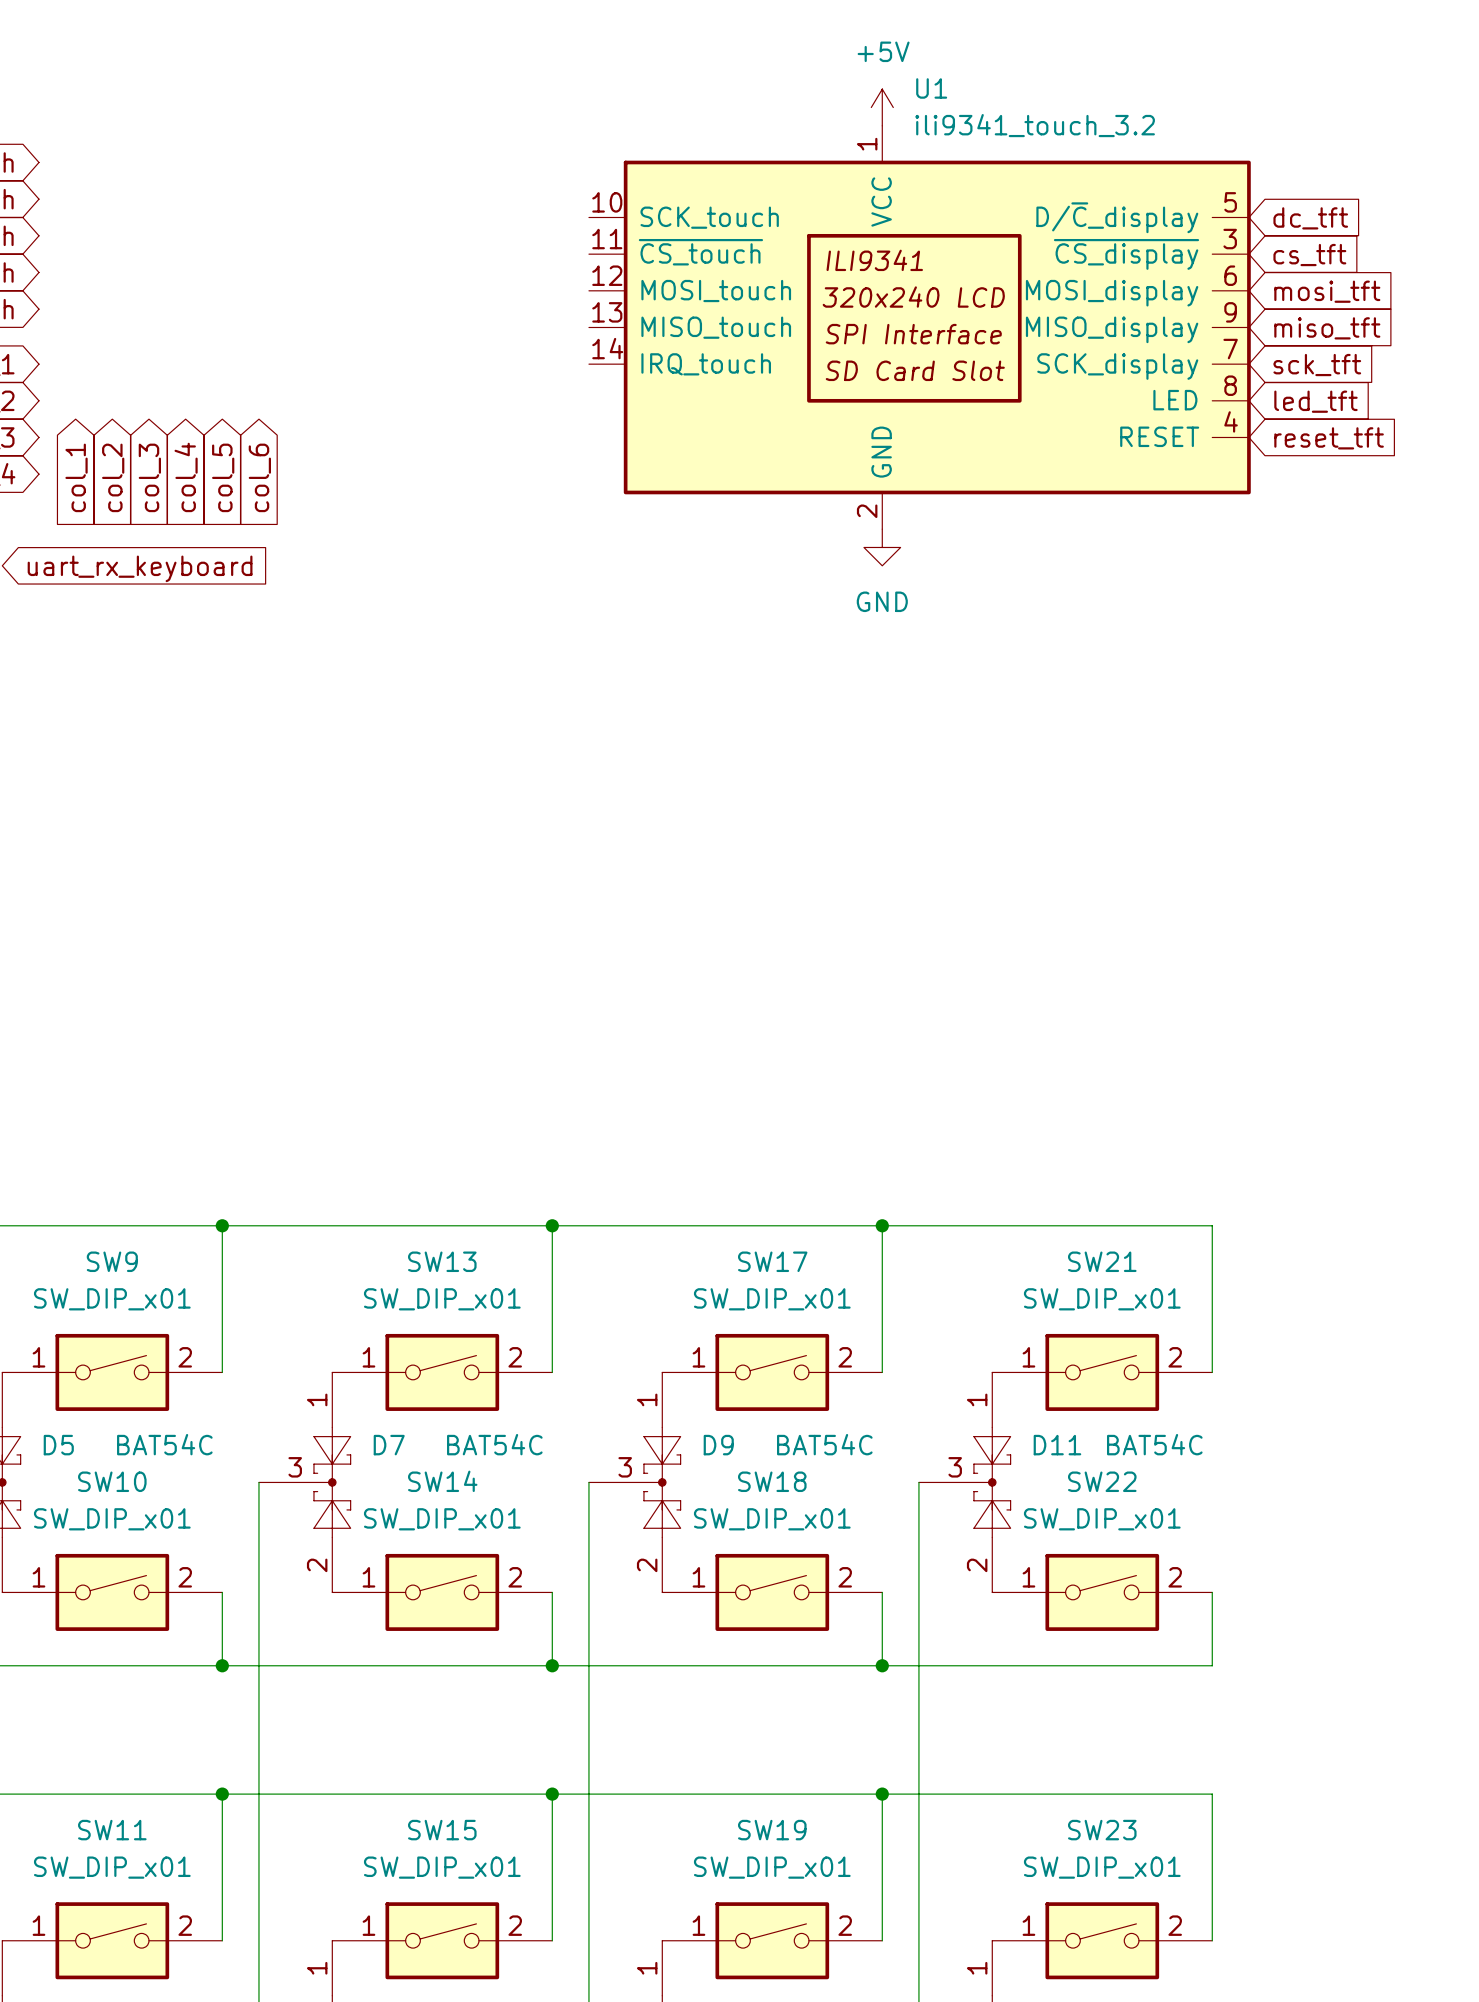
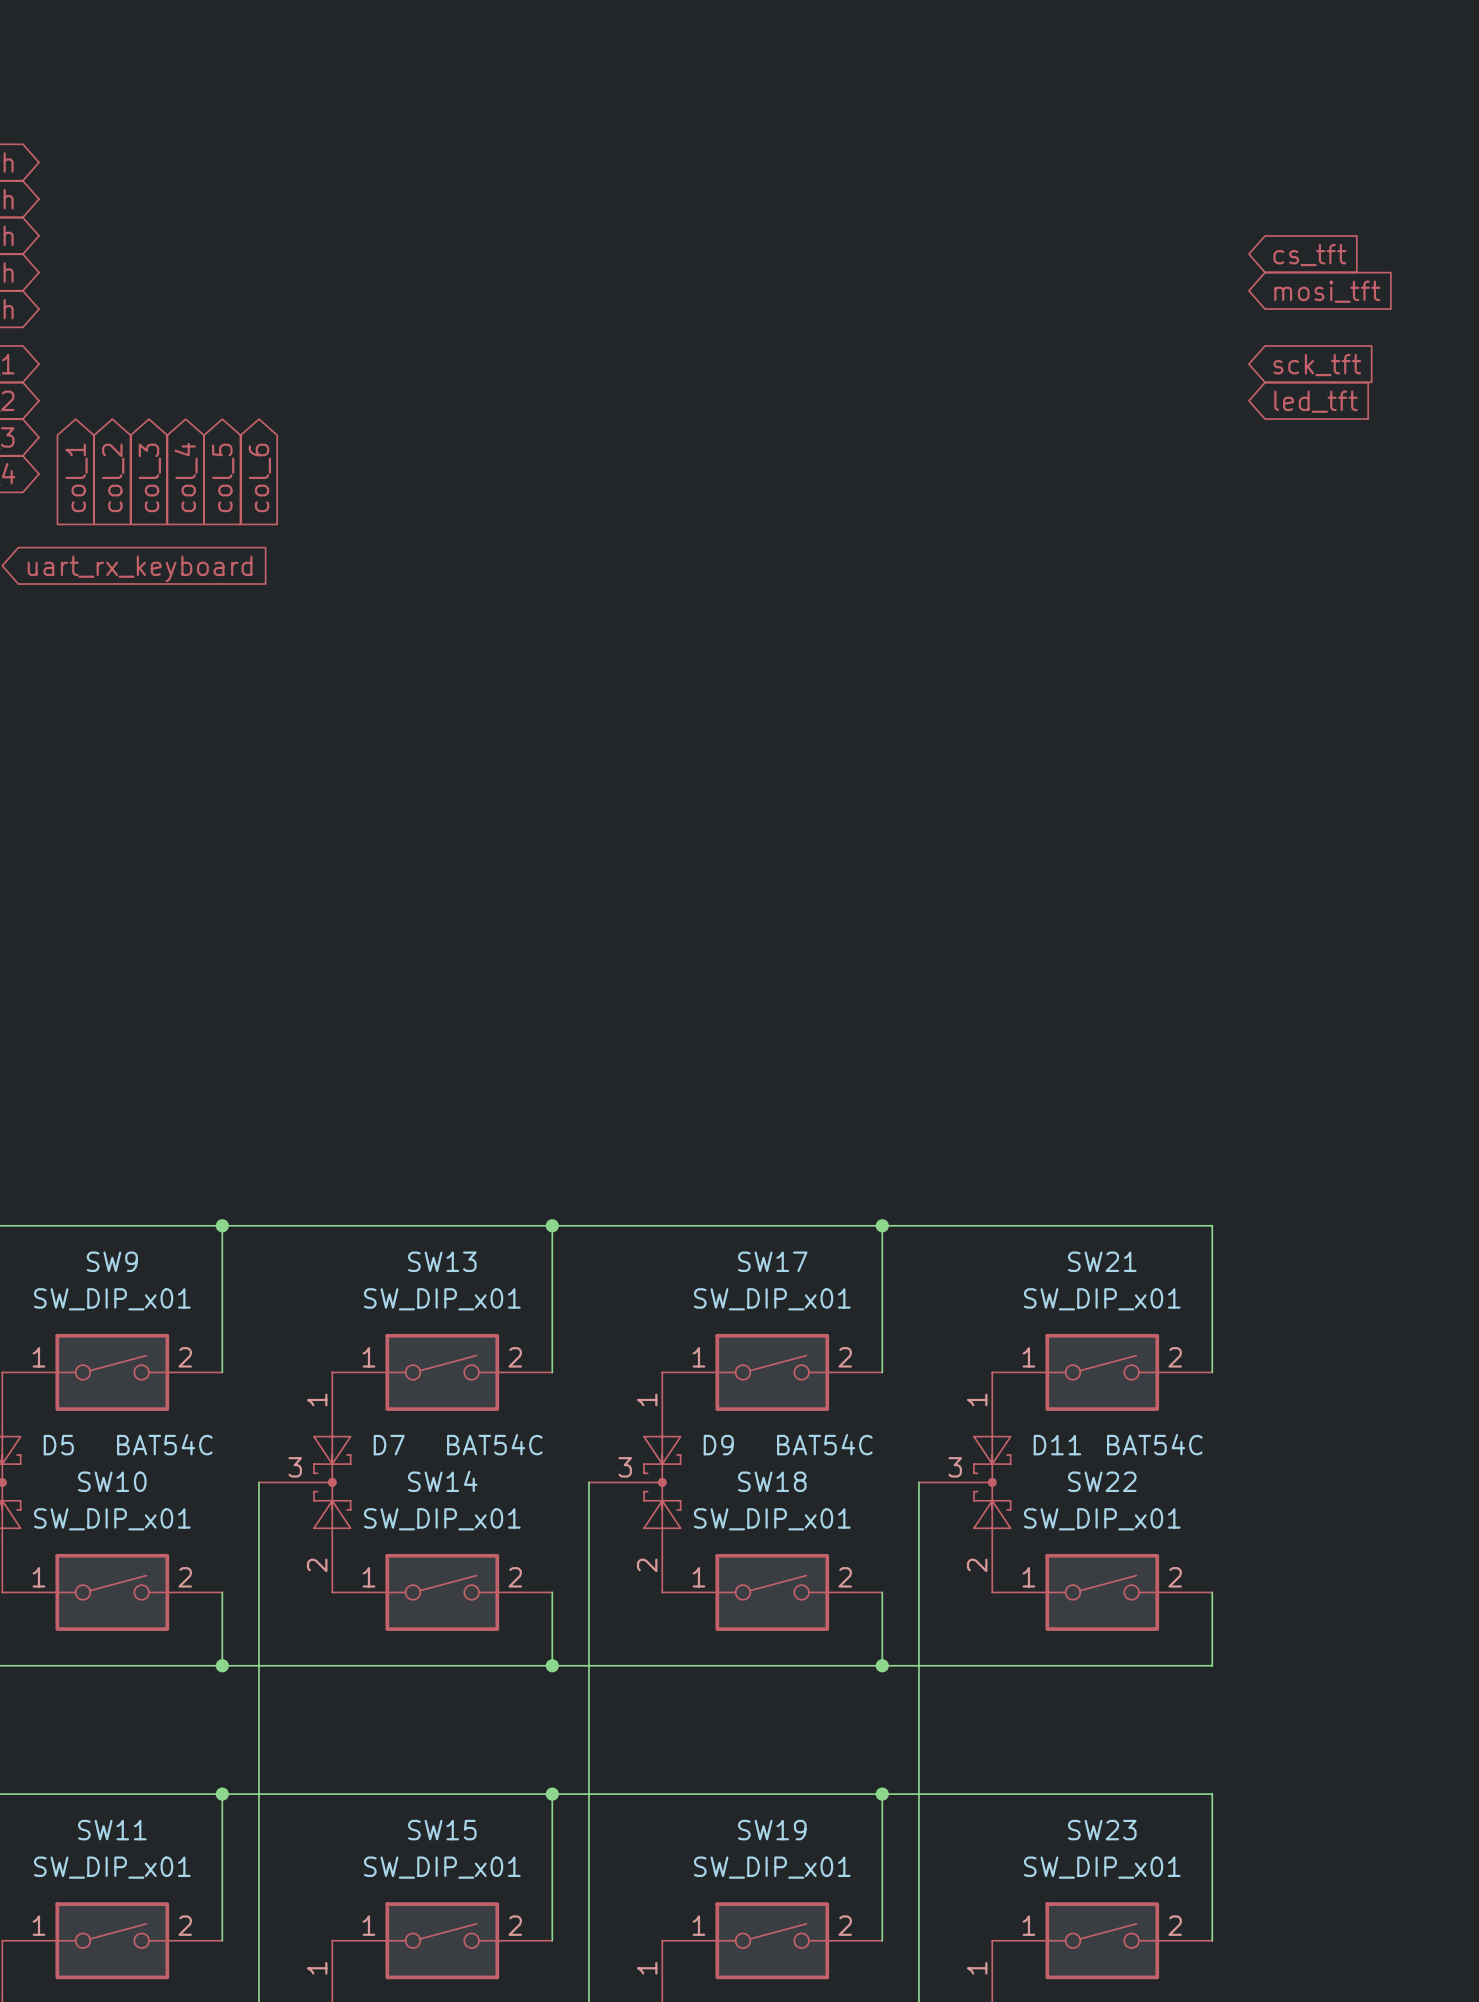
power symbol: +5V (882, 107) -> none
global label: dc_tft (1310, 218) -> none
U1: ili9341_touch_3.2 (919, 327) -> none
global label: miso_tft (1327, 328) -> none
global label: reset_tft (1329, 438) -> none
power symbol: GND (882, 547) -> none

